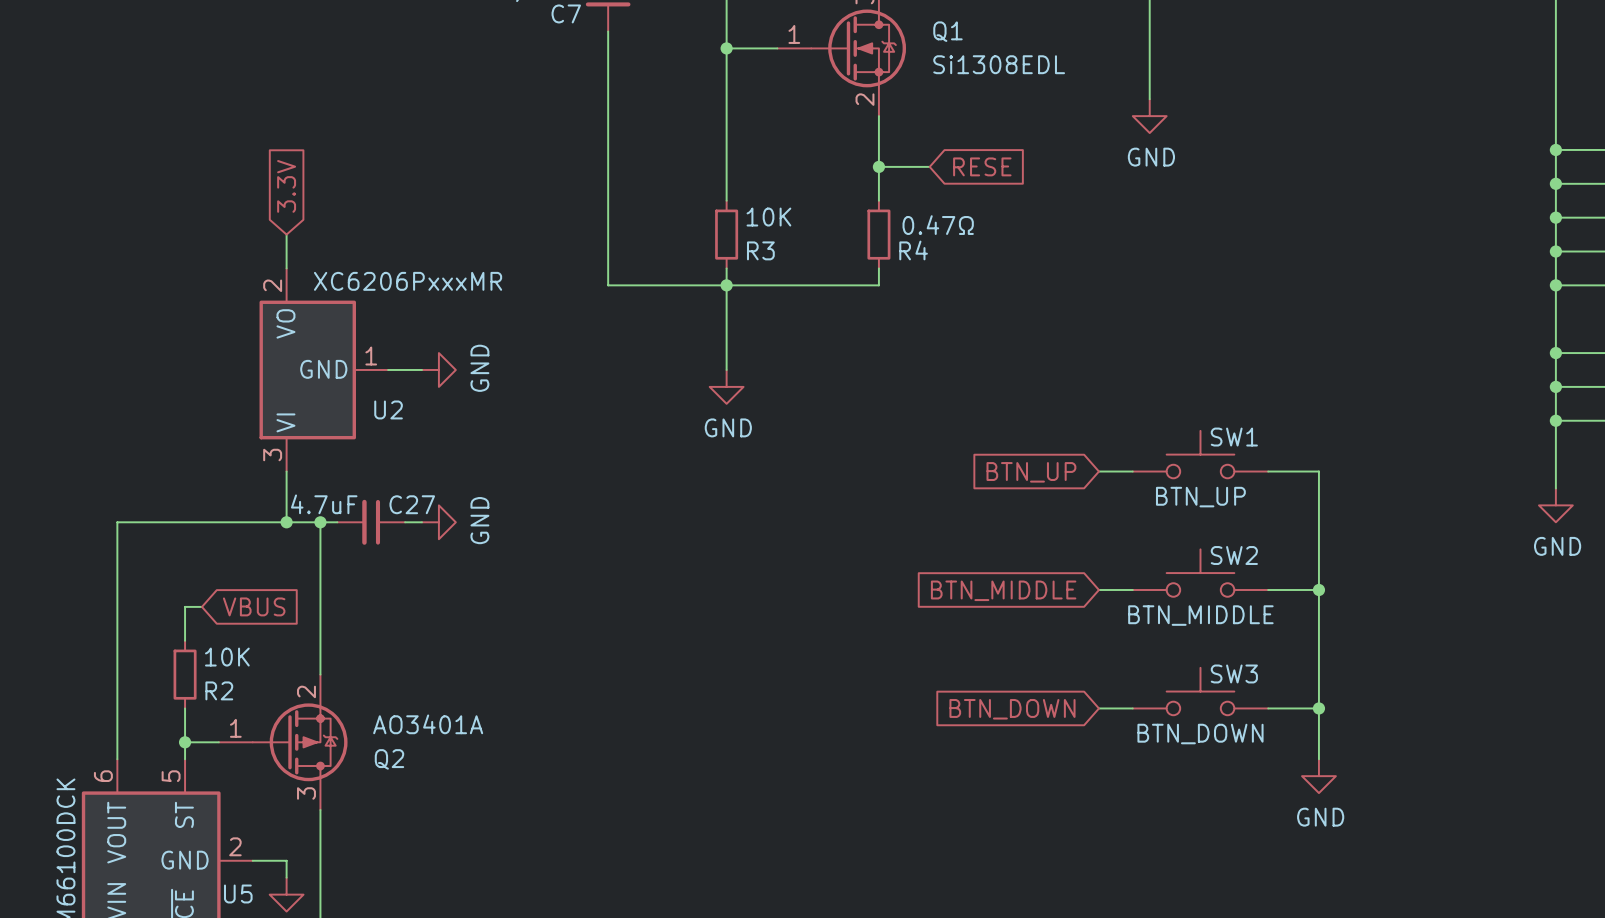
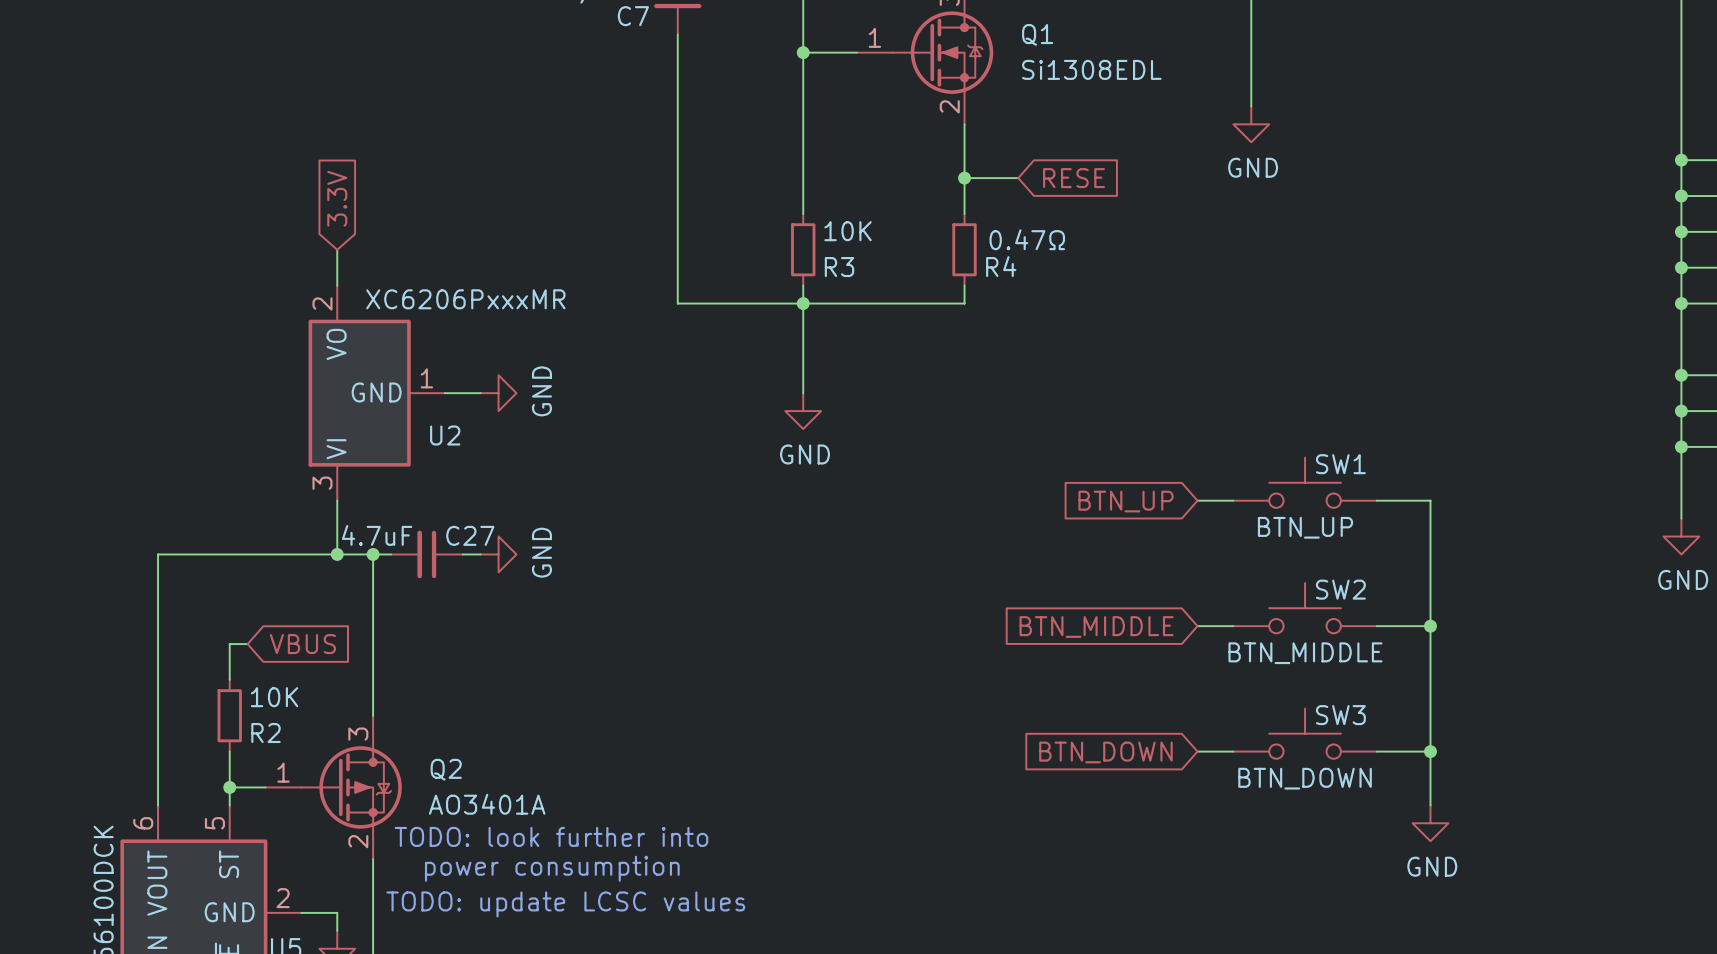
Q2 flip: as is (300, 742) -> up-down (351, 787)
text: none -> TODO: look further into (551, 836)
text: none -> power consumption (552, 868)
text: none -> TODO: update LCSC values (565, 904)

